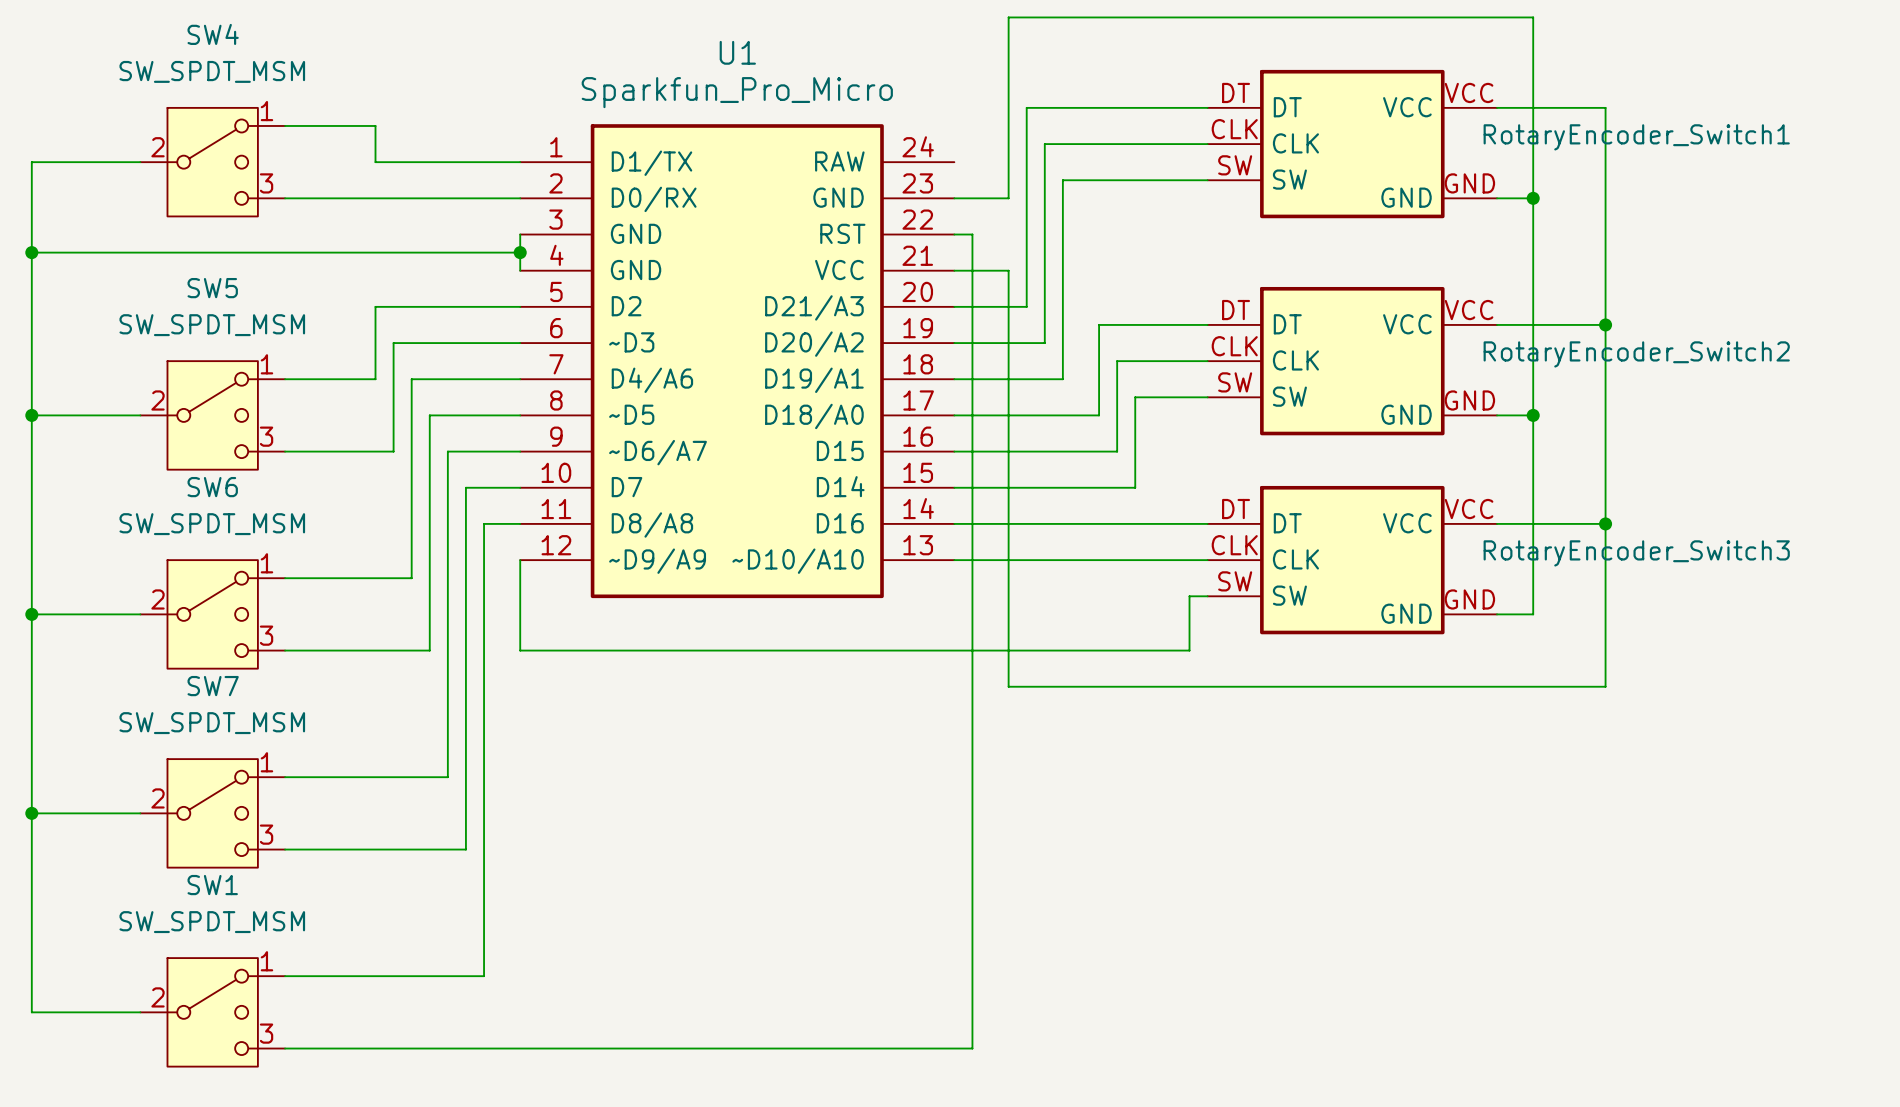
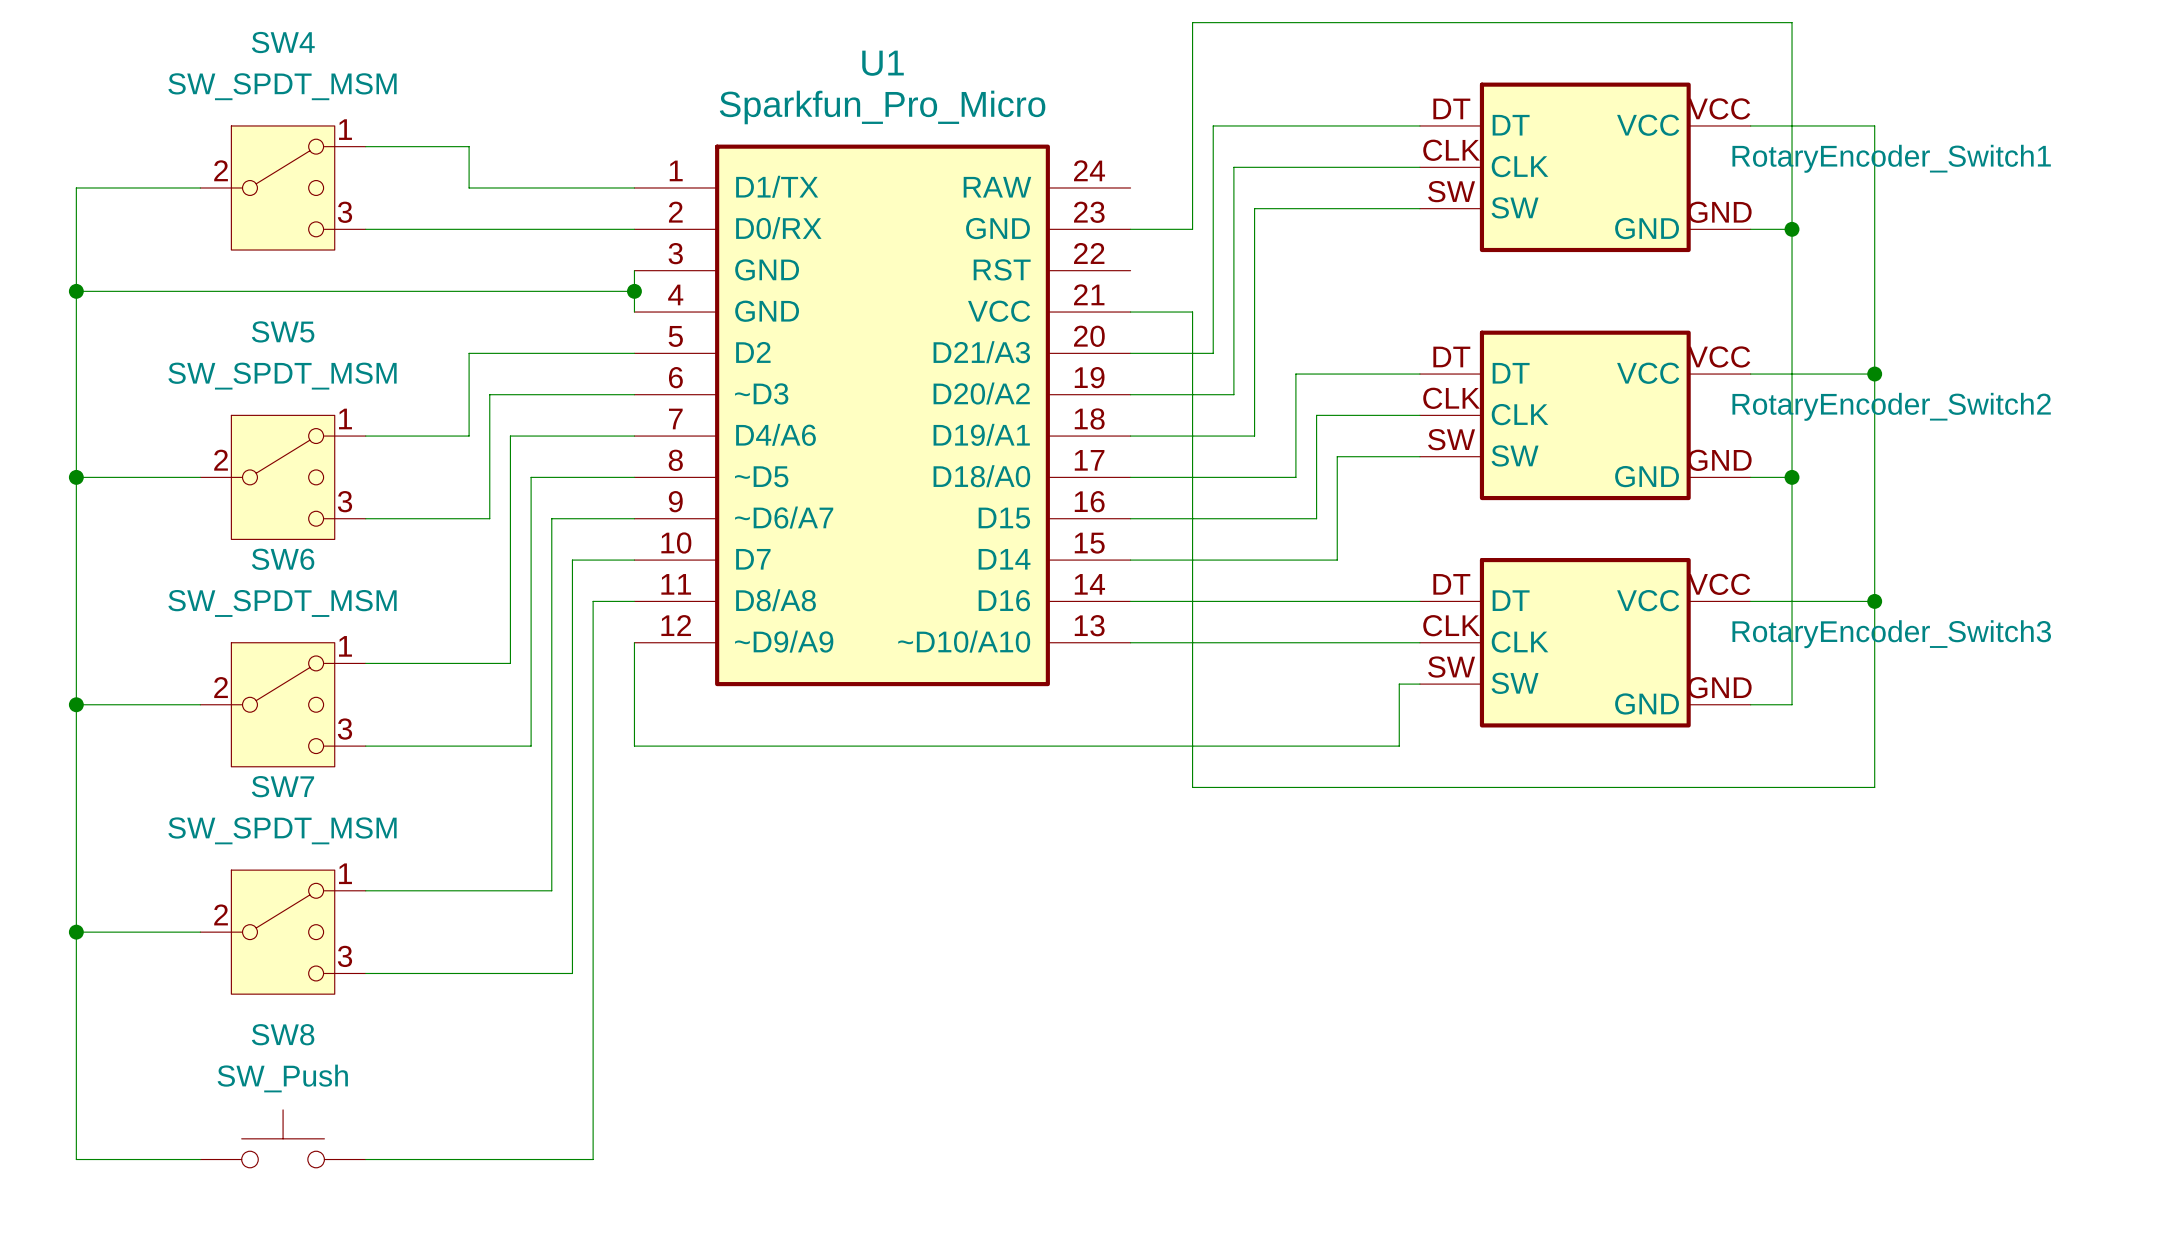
wire: (954, 234) (972, 234) (972, 1048) (285, 1048) -> none
wire: (285, 976) (484, 976) -> (365, 1159) (593, 1159) (593, 1118)
SW8: none -> SW_Push (283, 1138)
SW1: SW_SPDT_MSM (212, 1012) -> none

